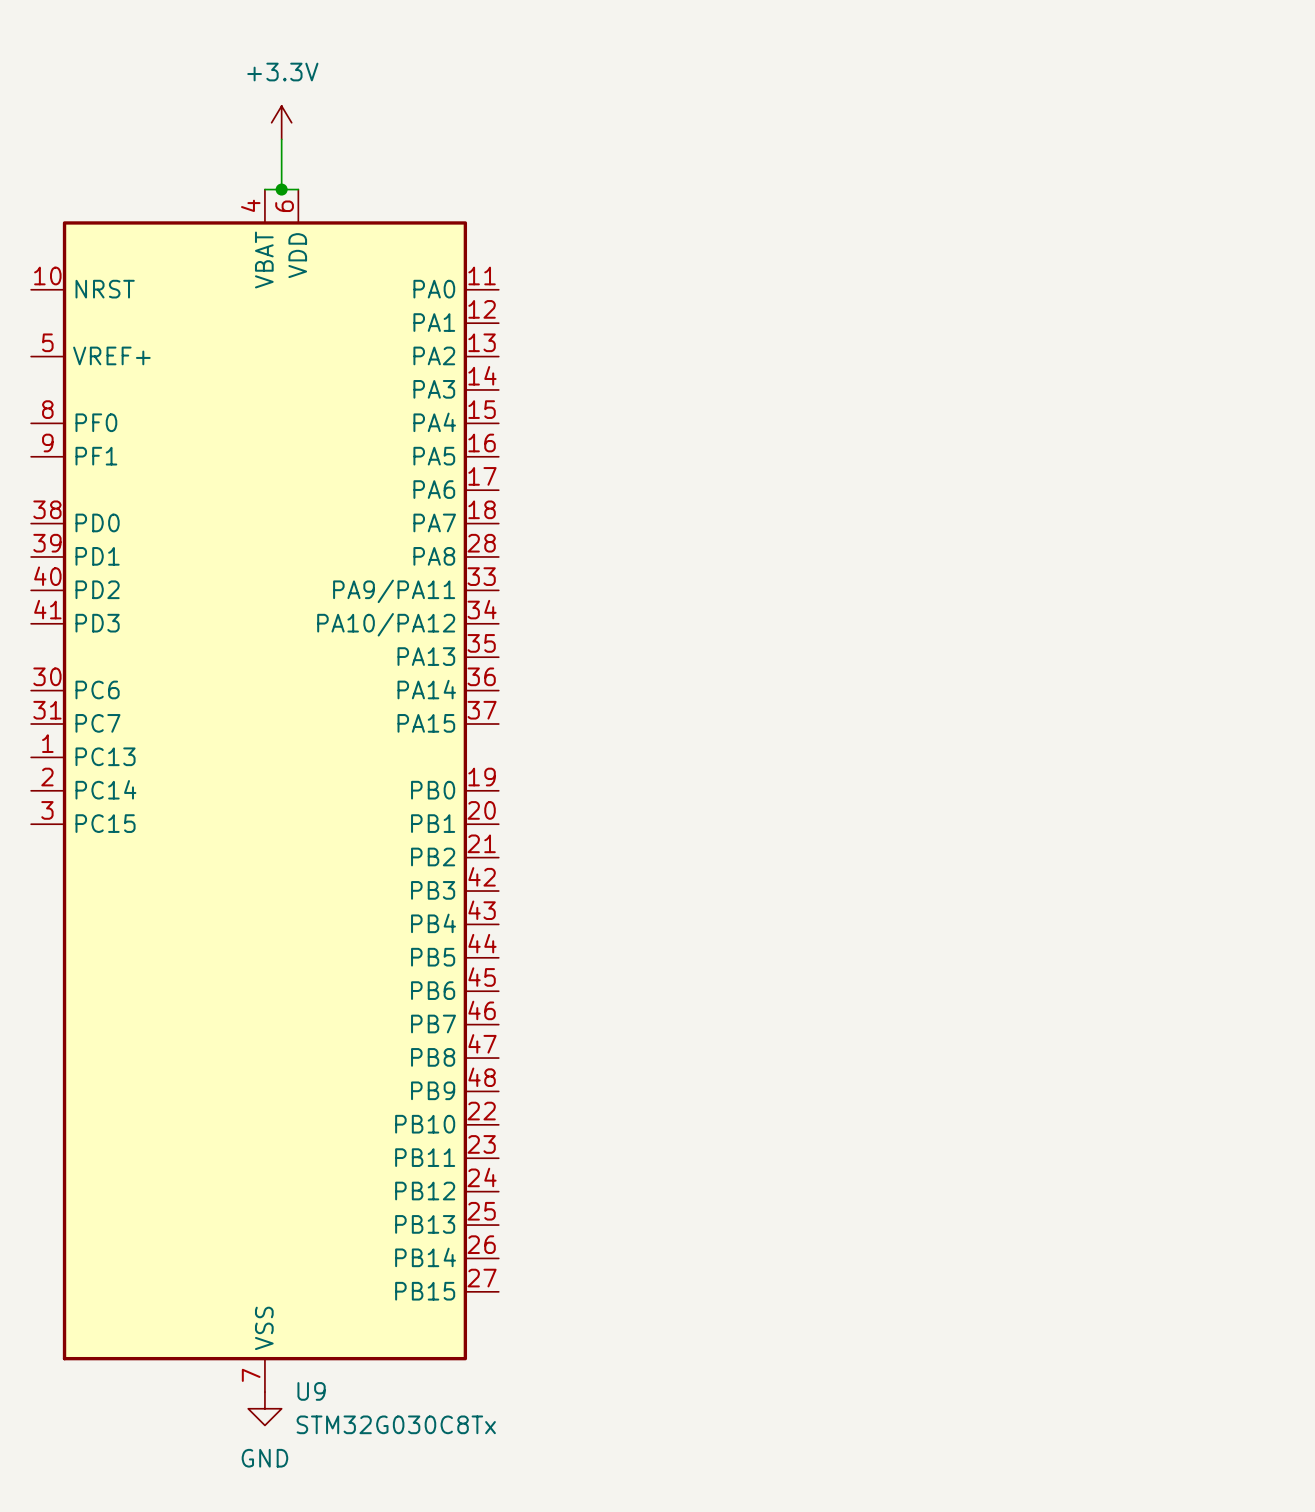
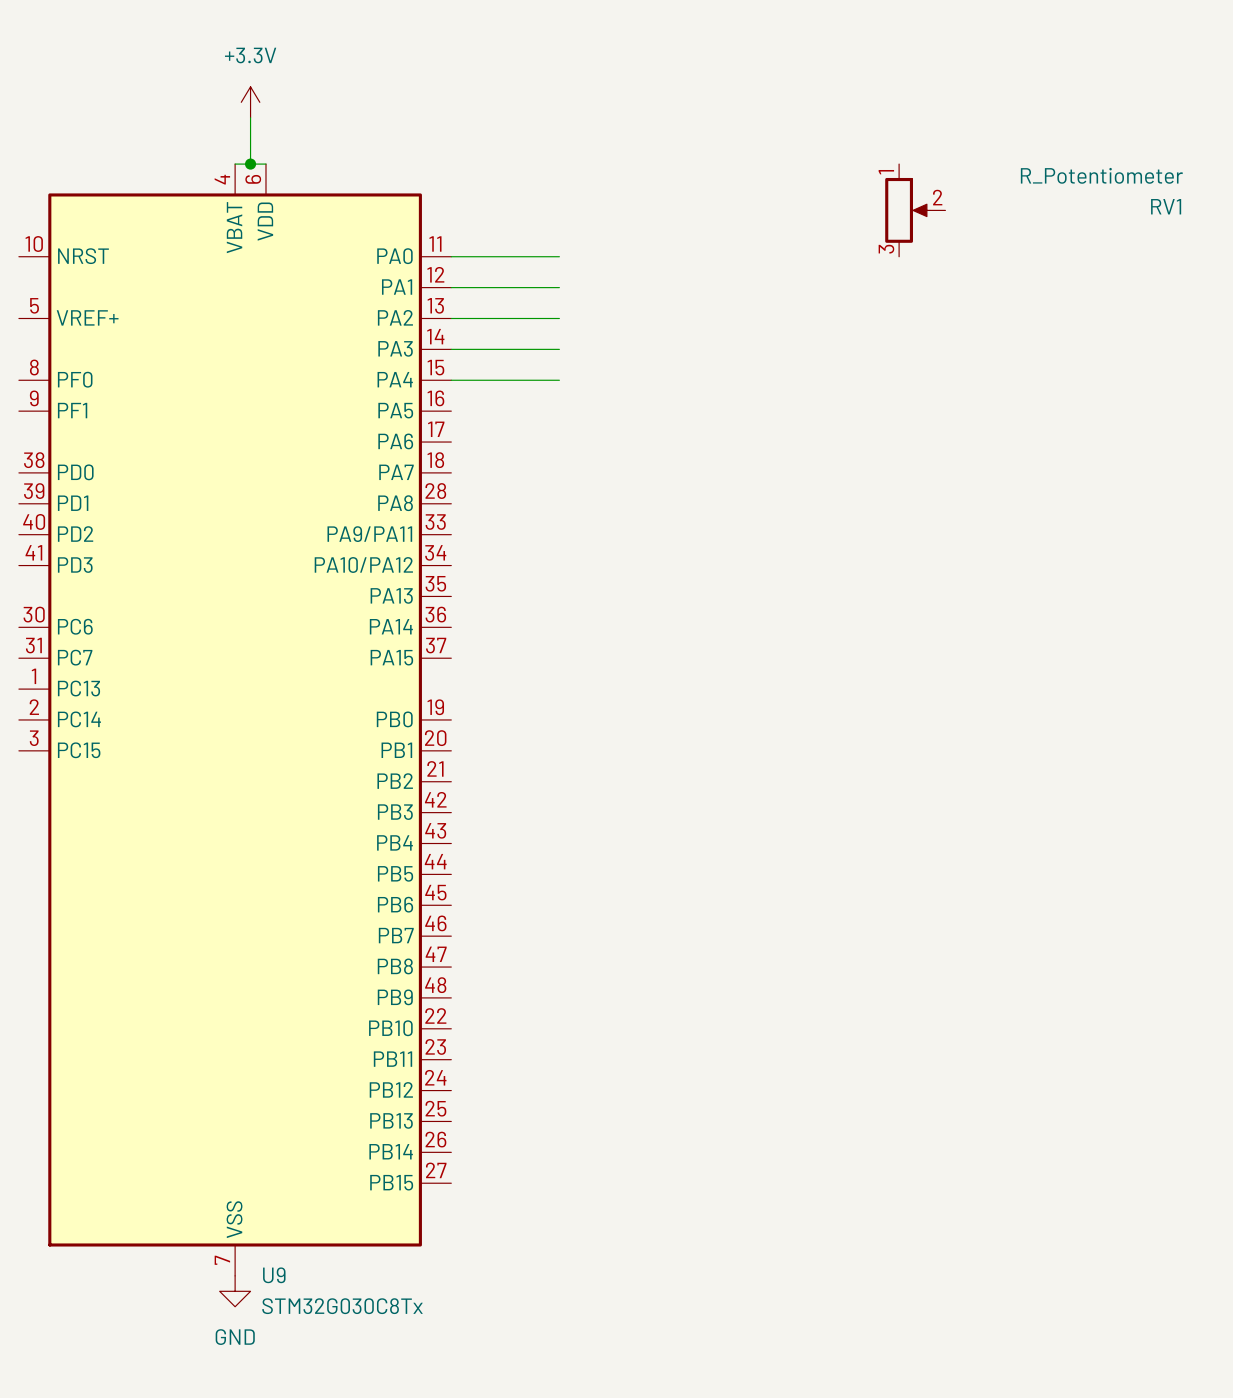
RV1: none -> R_Potentiometer (915, 210)
wire: none -> (451, 256) (559, 256)
wire: none -> (451, 287) (559, 287)
wire: none -> (451, 318) (559, 318)
wire: none -> (451, 349) (559, 349)
wire: none -> (451, 380) (559, 380)

